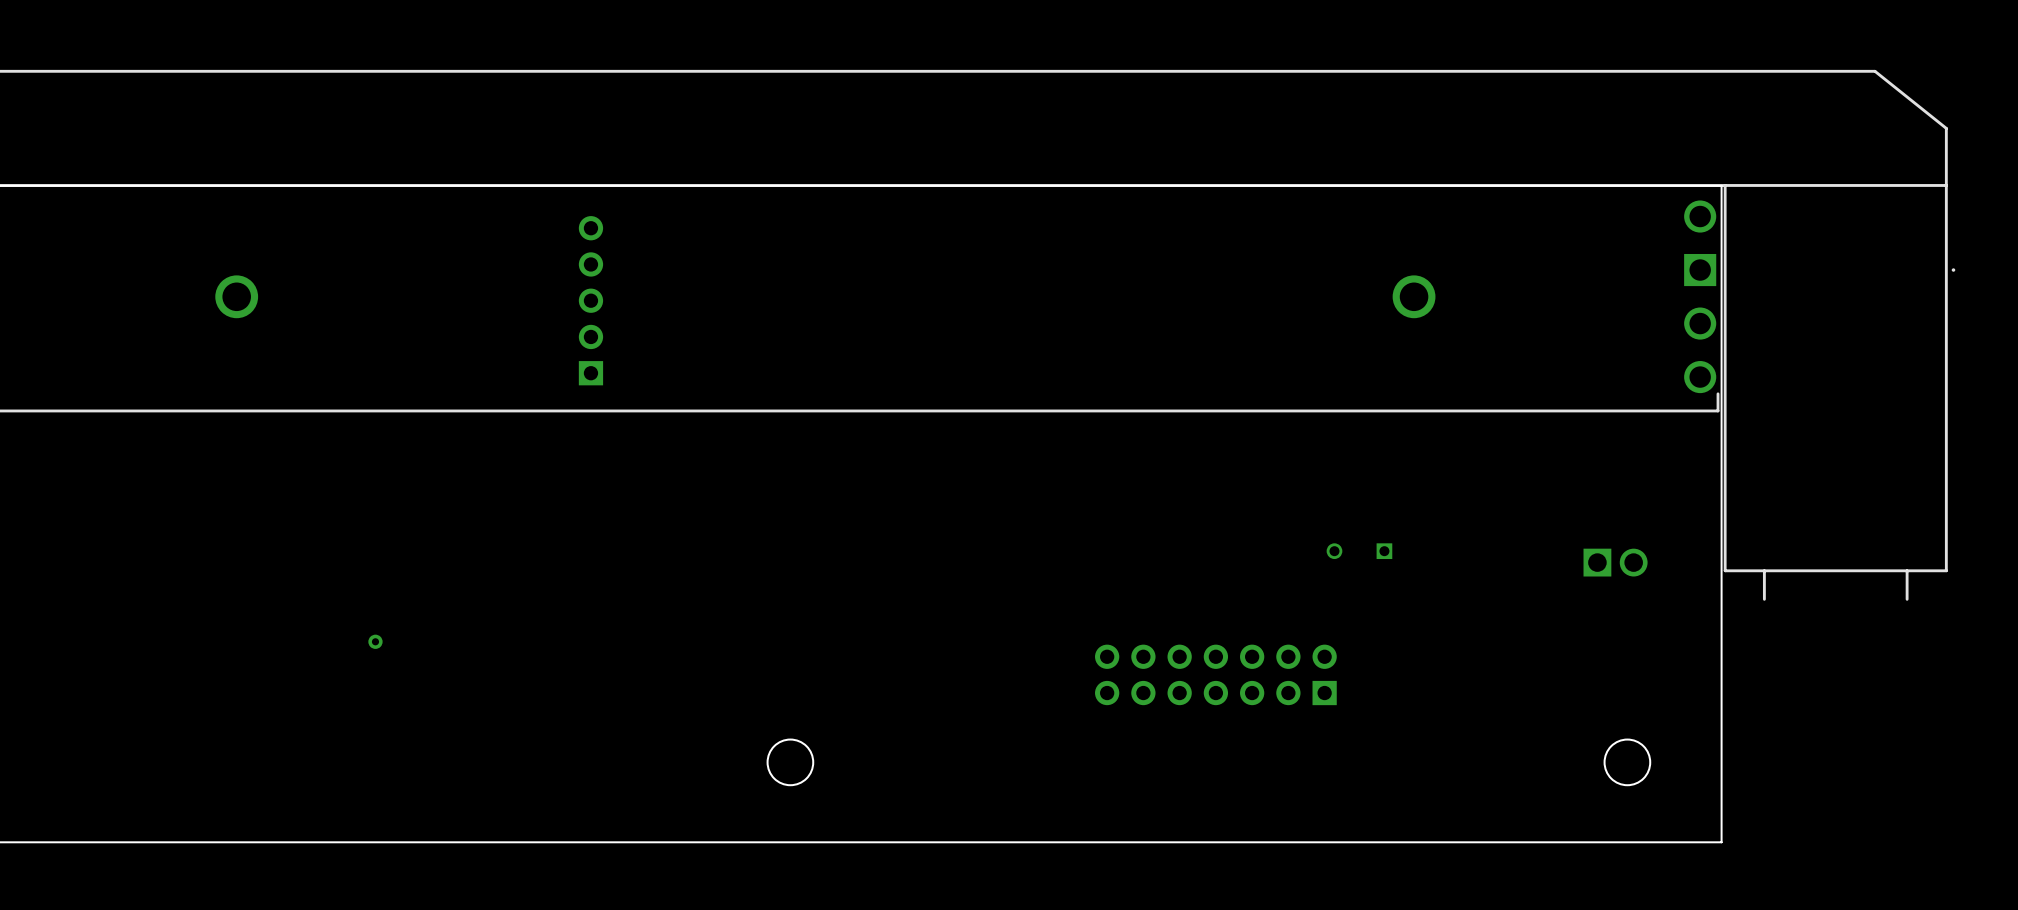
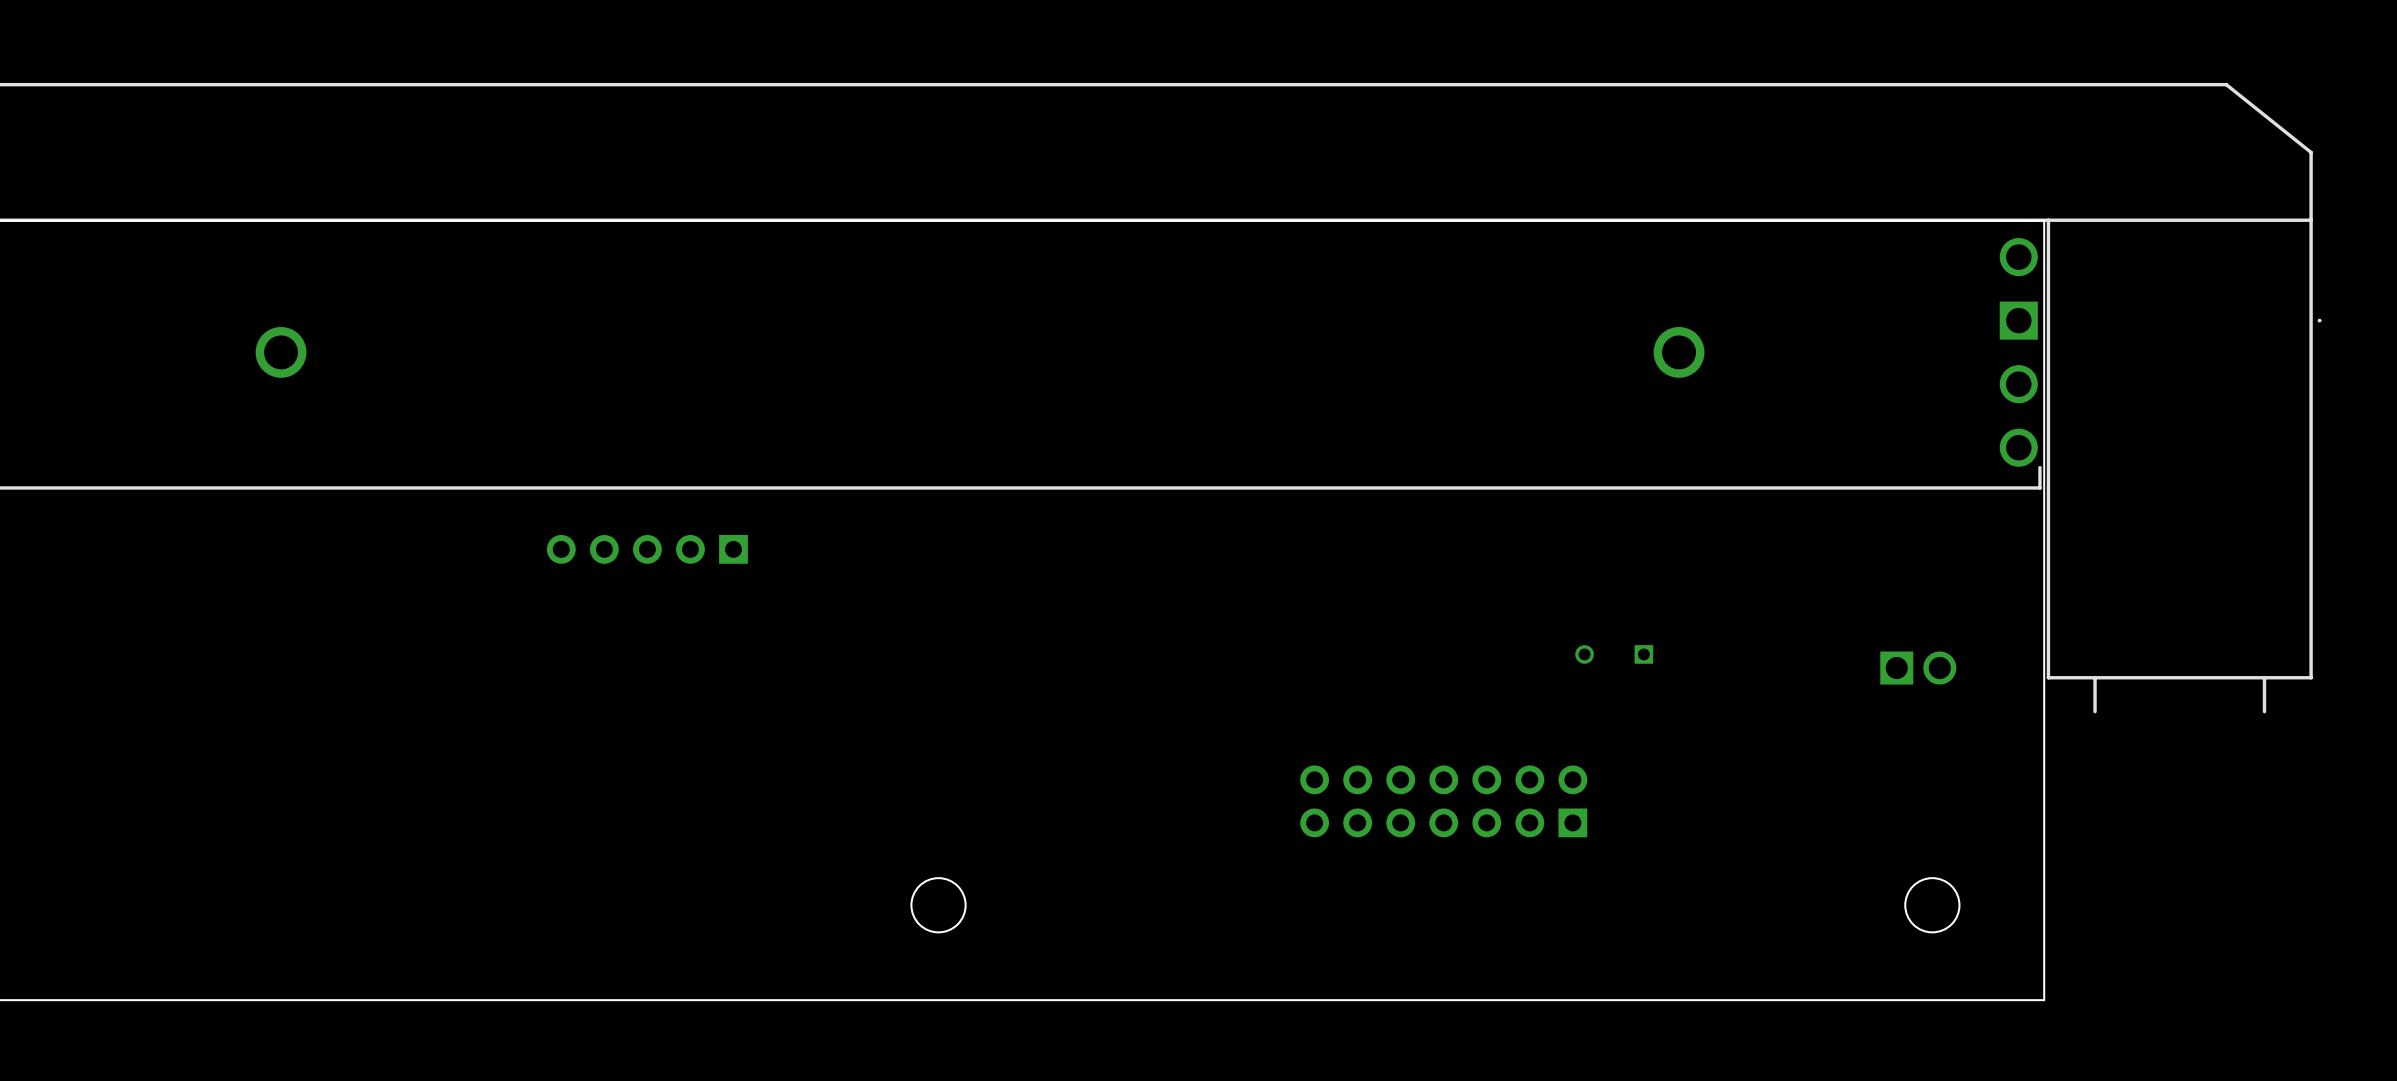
part rotation: 0° (590, 300) -> 90° counterclockwise (647, 549)
part position: (590, 300) -> (647, 549)
part: (375, 641) -> none

